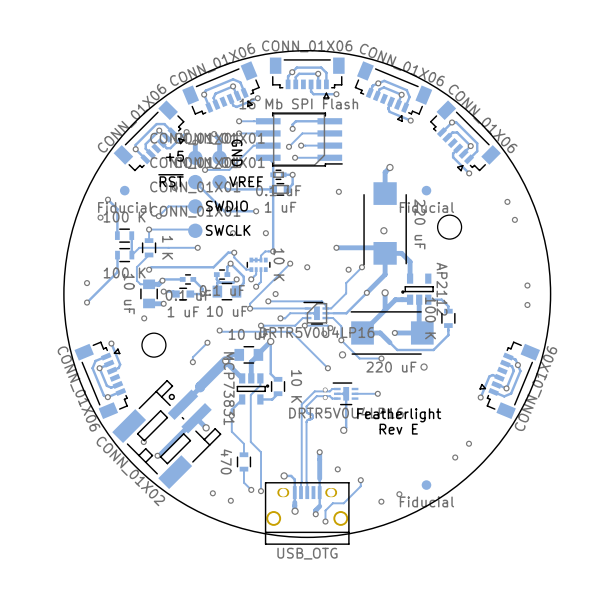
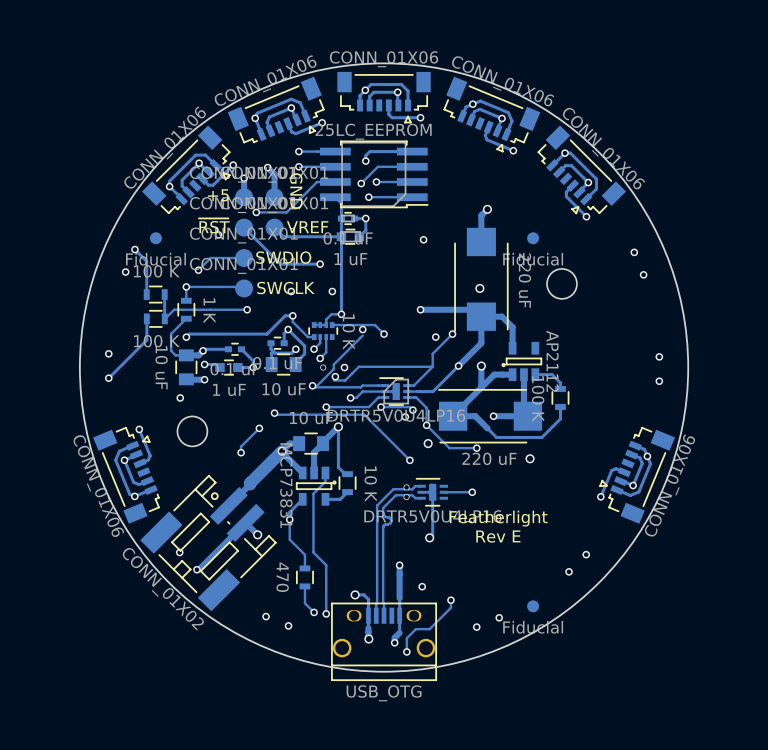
part value: 16 Mb SPI Flash (298, 103) -> 25LC_EEPROM (373, 131)
track: none -> (332, 325) (375, 325) (384, 334)
track: (290, 263) (250, 303) (250, 308) -> none
track: none -> (432, 366) (358, 366) (345, 380) (333, 380)
via: none -> (323, 367)
track: (268, 301) (321, 301) (325, 305) (325, 308) -> none
track: (290, 308) (250, 309) -> (362, 385) (360, 387) (315, 387) (333, 369) (333, 364) (362, 335)

